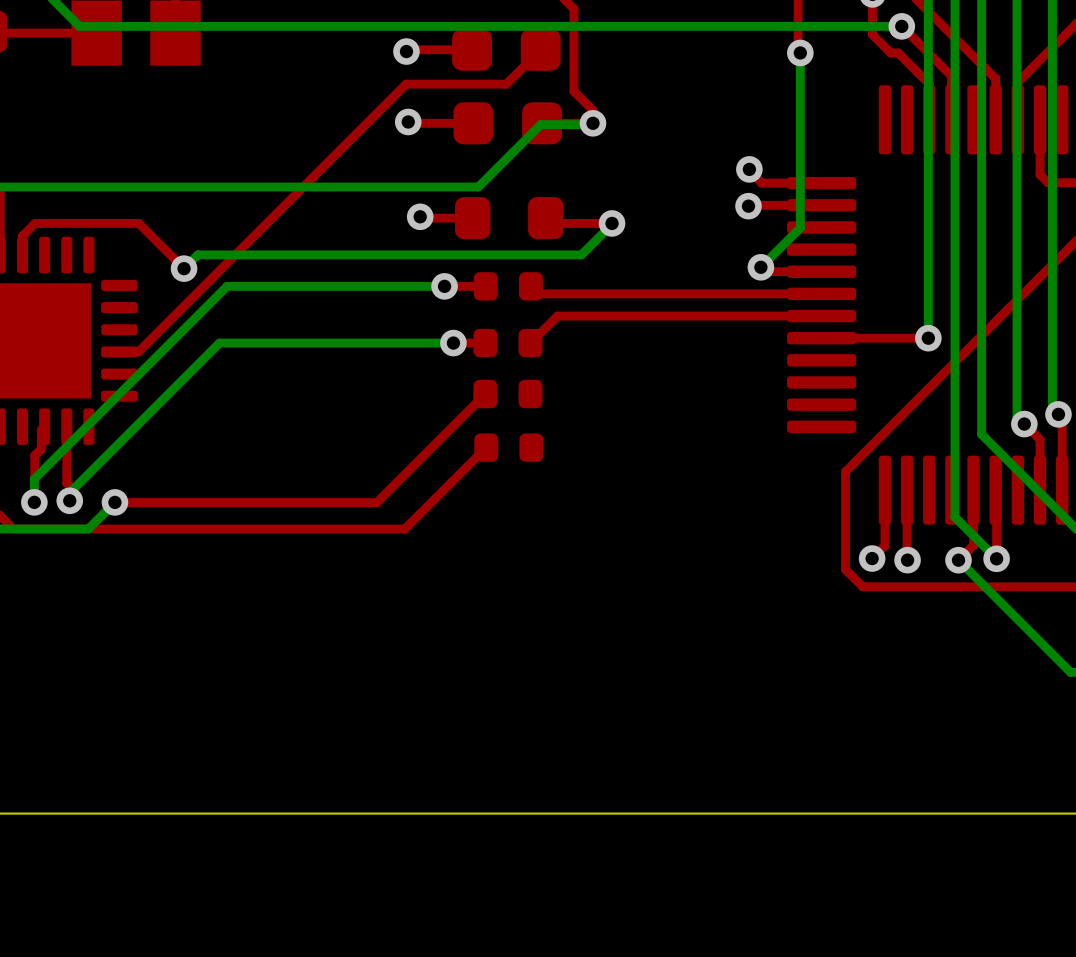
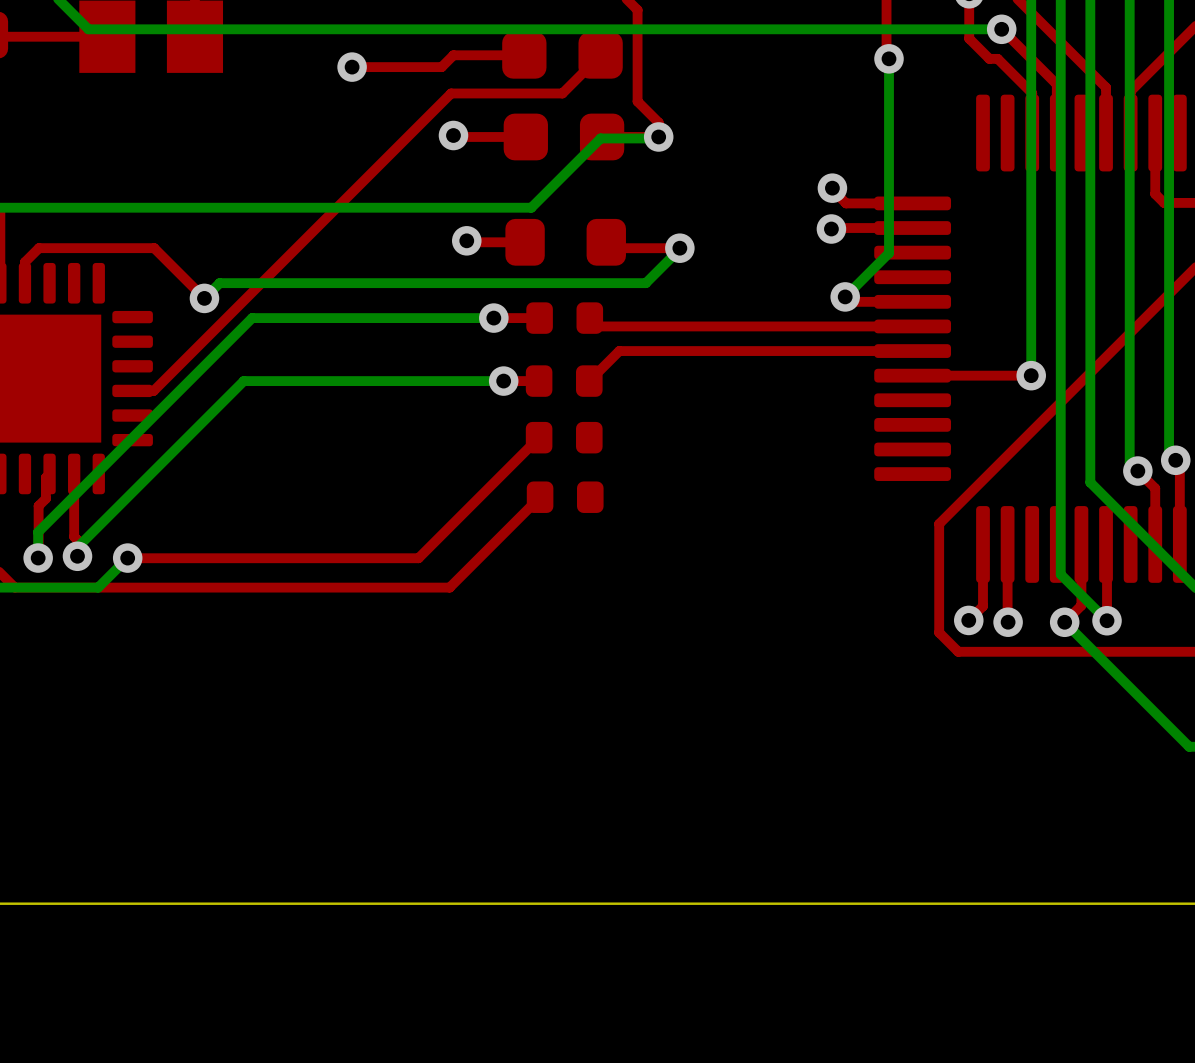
top track: none -> (451, 57) (441, 67) (352, 67)
via: (406, 51) -> none
via: none -> (352, 67)

